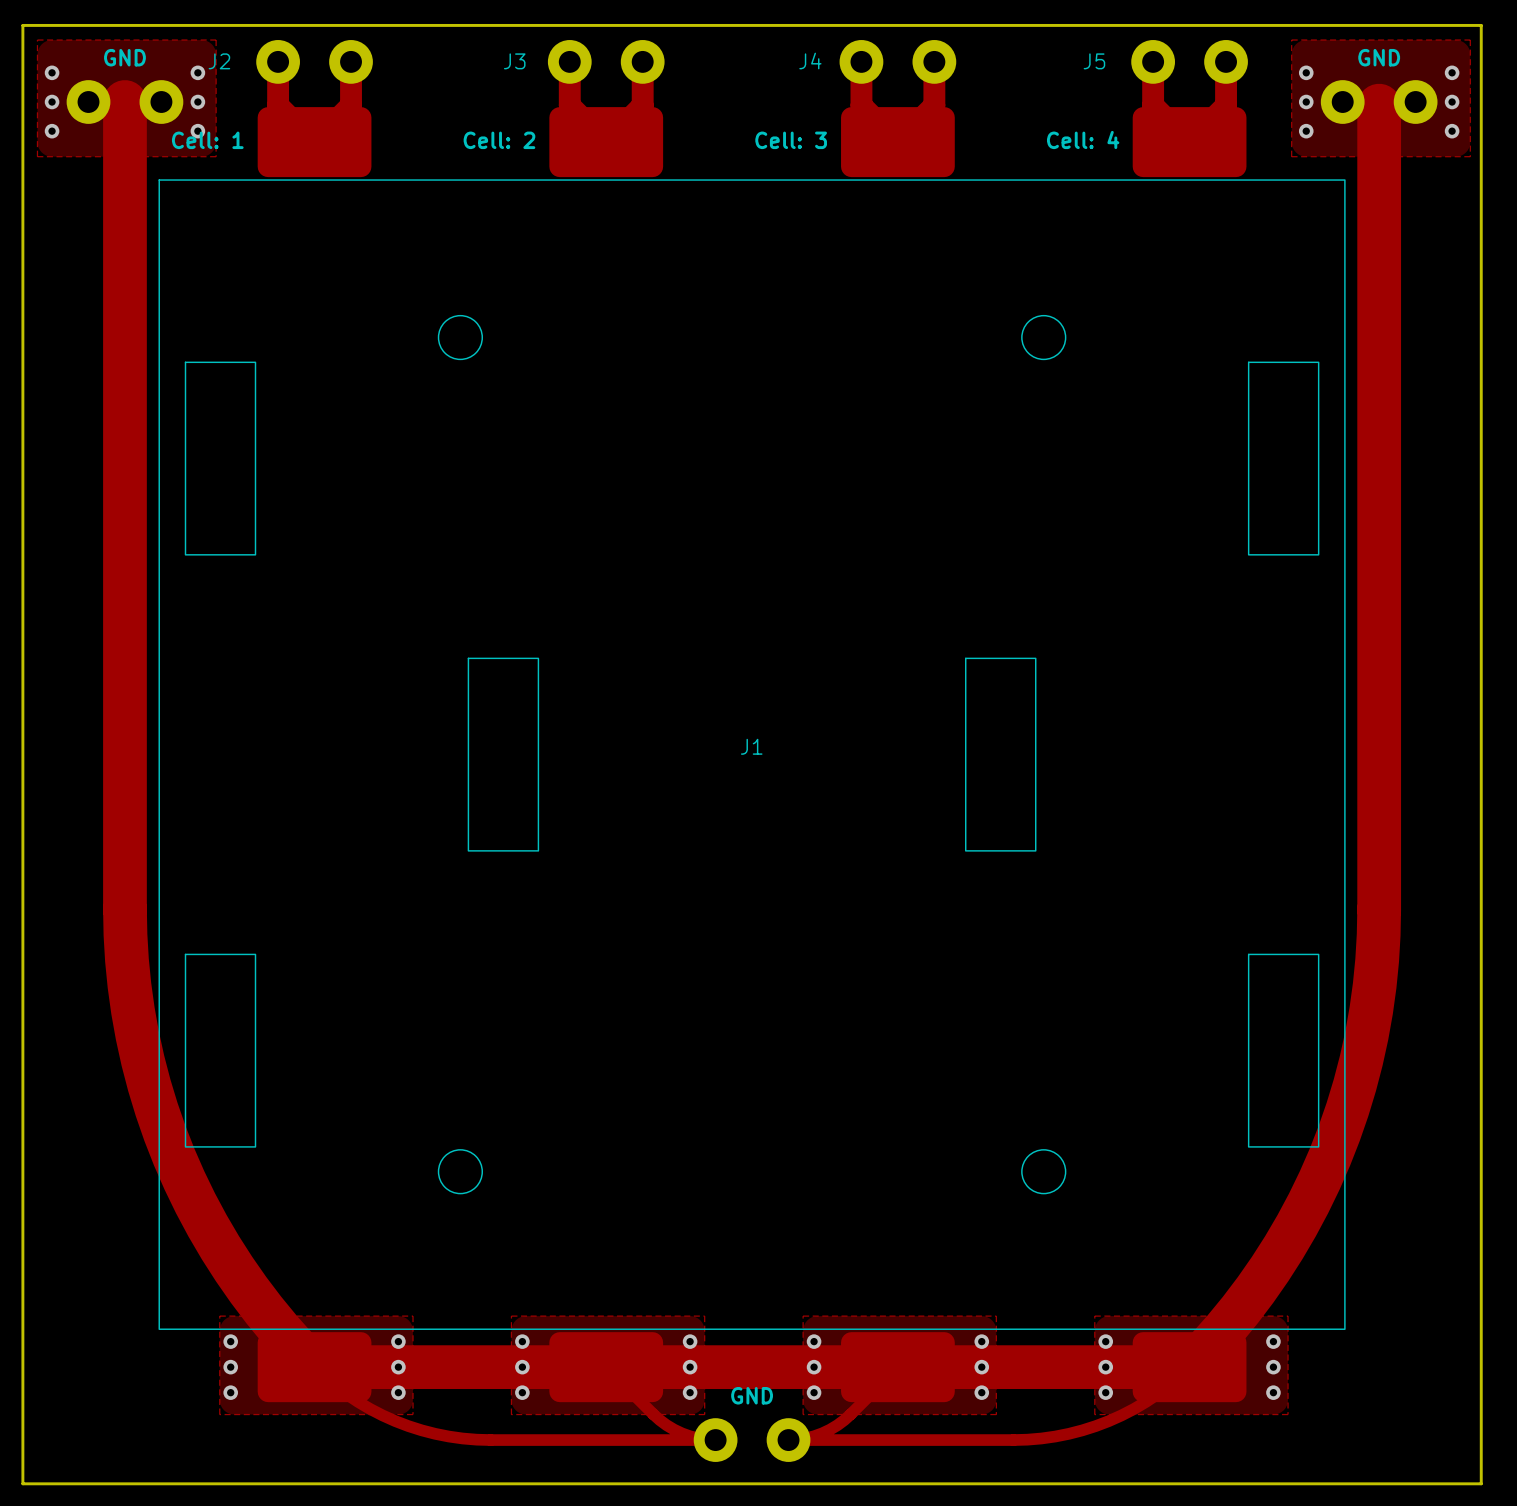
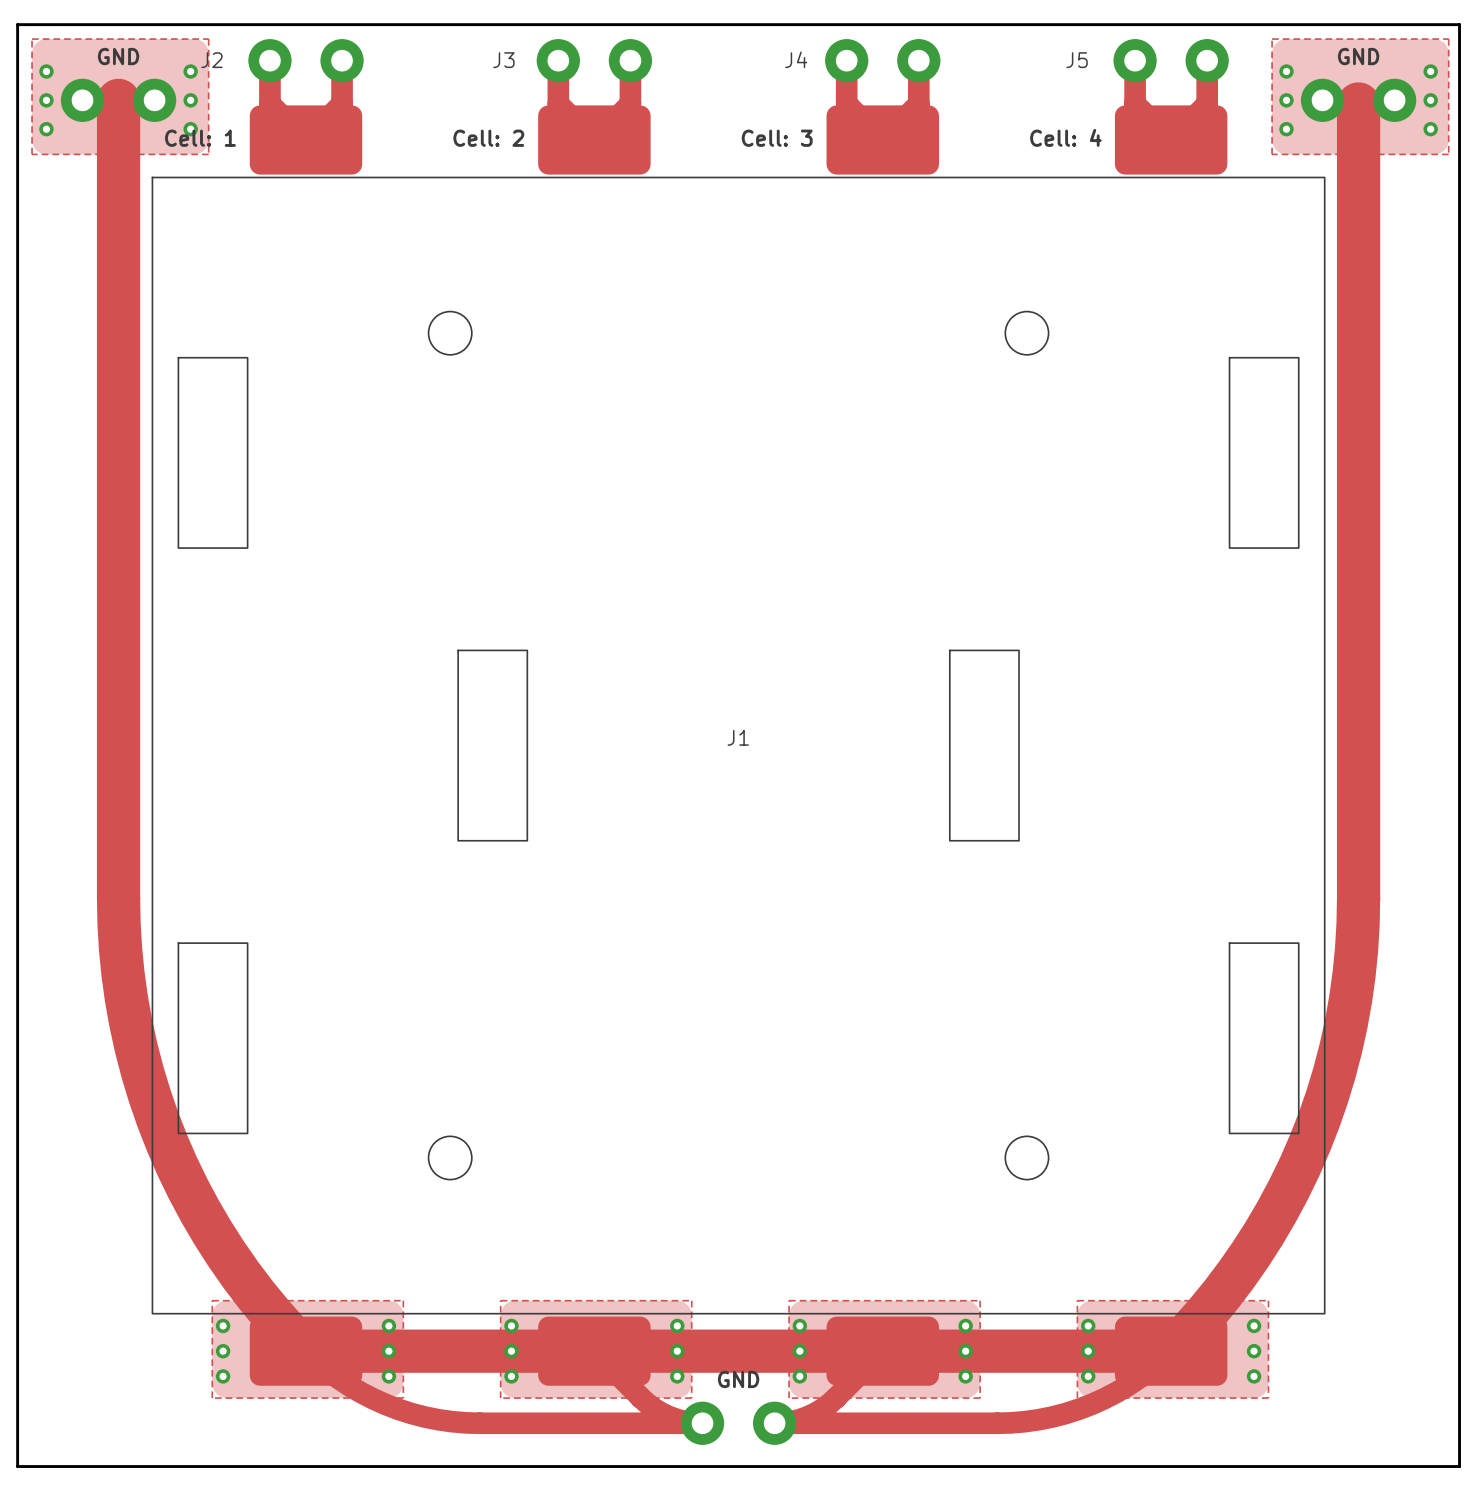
track width: thin (314, 1367) (335, 1385) (370, 1409) (408, 1426) (448, 1436) (490, 1440) (715, 1440) (690, 1436) (666, 1425) (606, 1367) -> thick (306, 1351) (326, 1369) (360, 1392) (398, 1409) (438, 1419) (480, 1423) (702, 1423) (677, 1419) (654, 1408) (594, 1351)
track width: thin (897, 1367) (837, 1425) (814, 1436) (788, 1440) (1013, 1440) (1055, 1436) (1082, 1430) (1121, 1415) (1157, 1394) (1189, 1367) -> thick (882, 1351) (822, 1408) (799, 1419) (774, 1423) (997, 1423) (1038, 1419) (1065, 1413) (1103, 1398) (1139, 1377) (1171, 1351)

